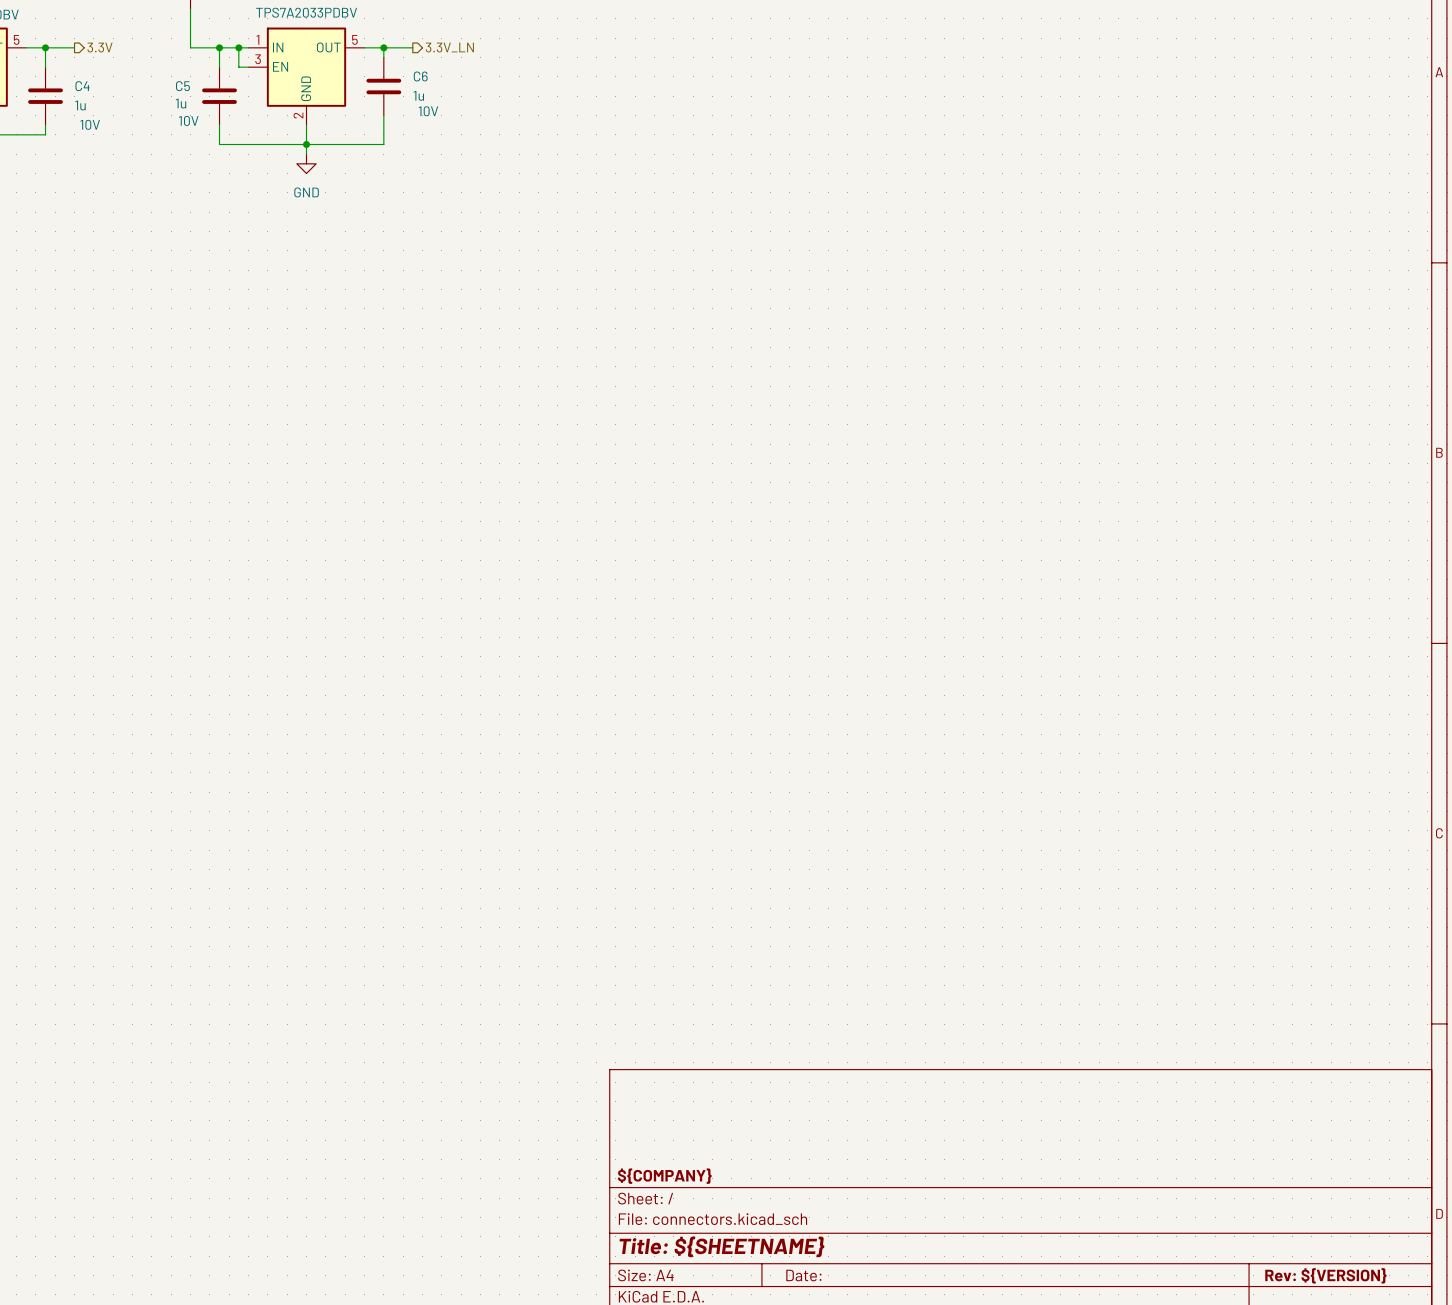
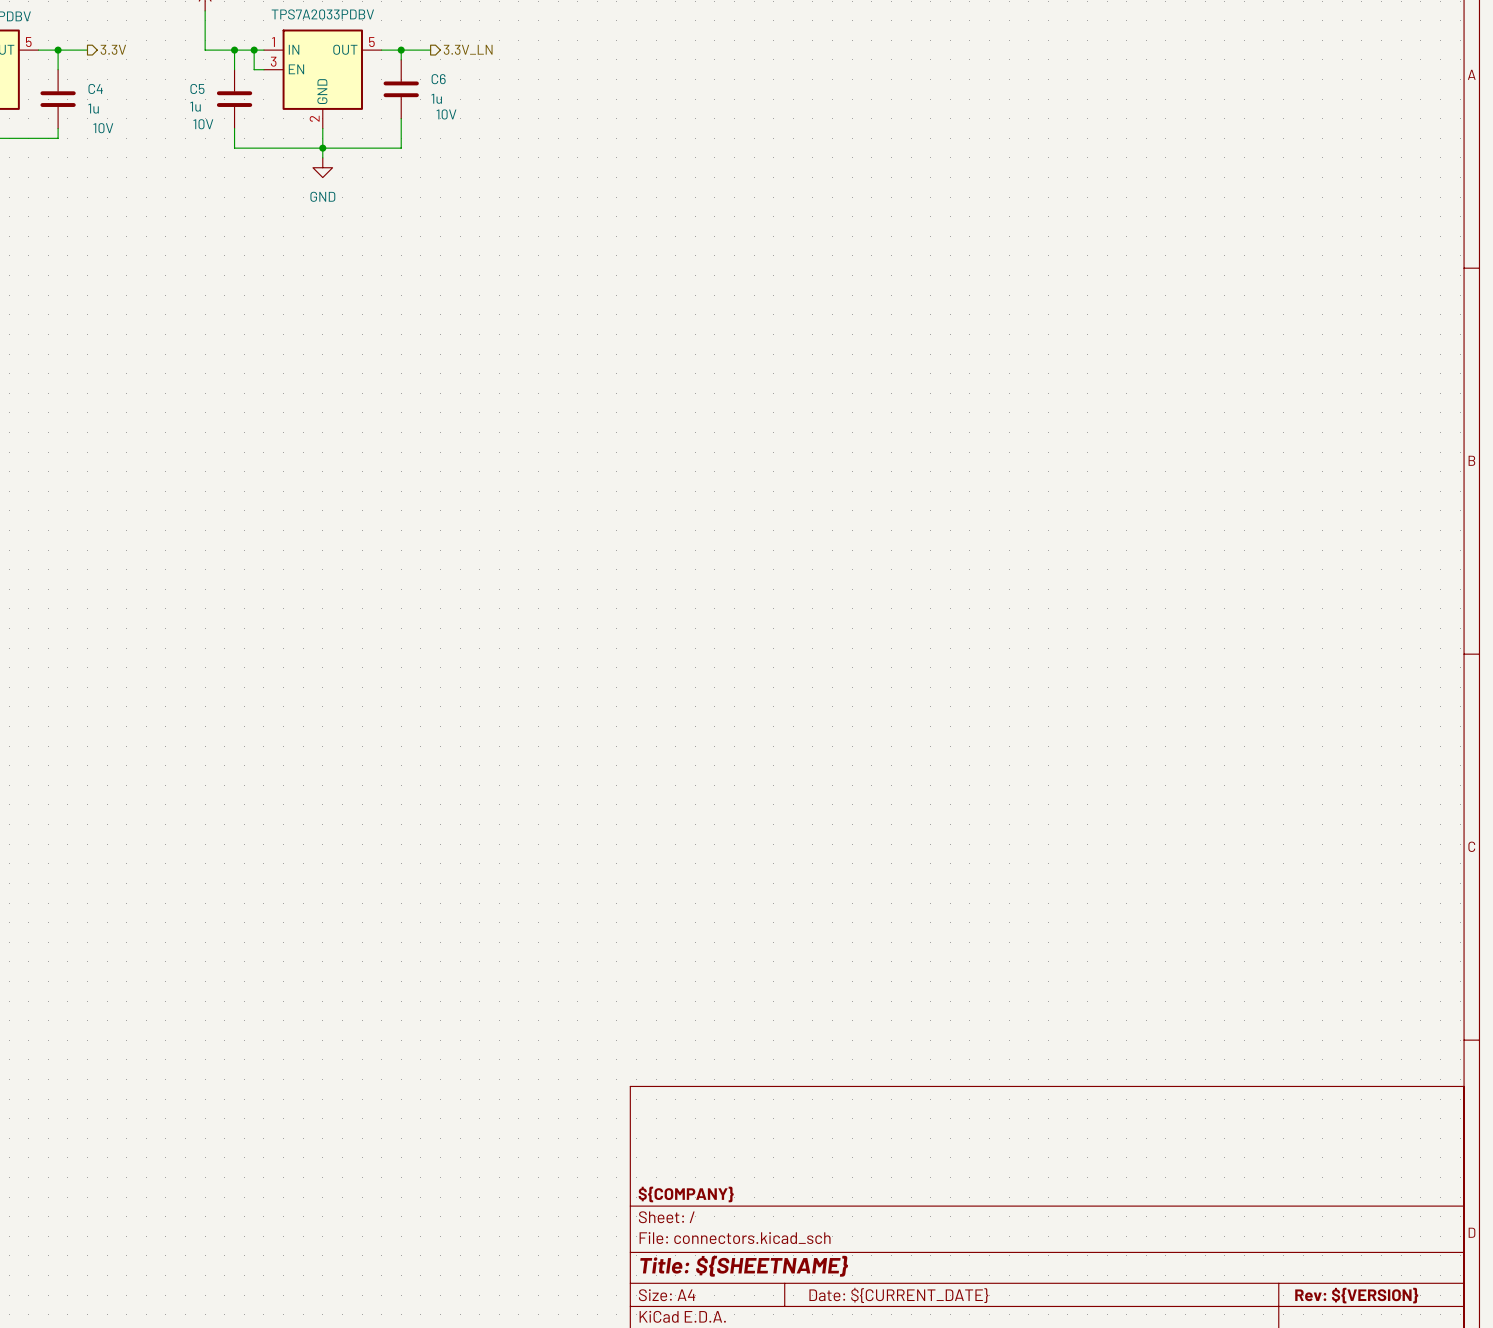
title block: Date: (803, 1275) -> Date: ${CURRENT_DATE} (898, 1295)

